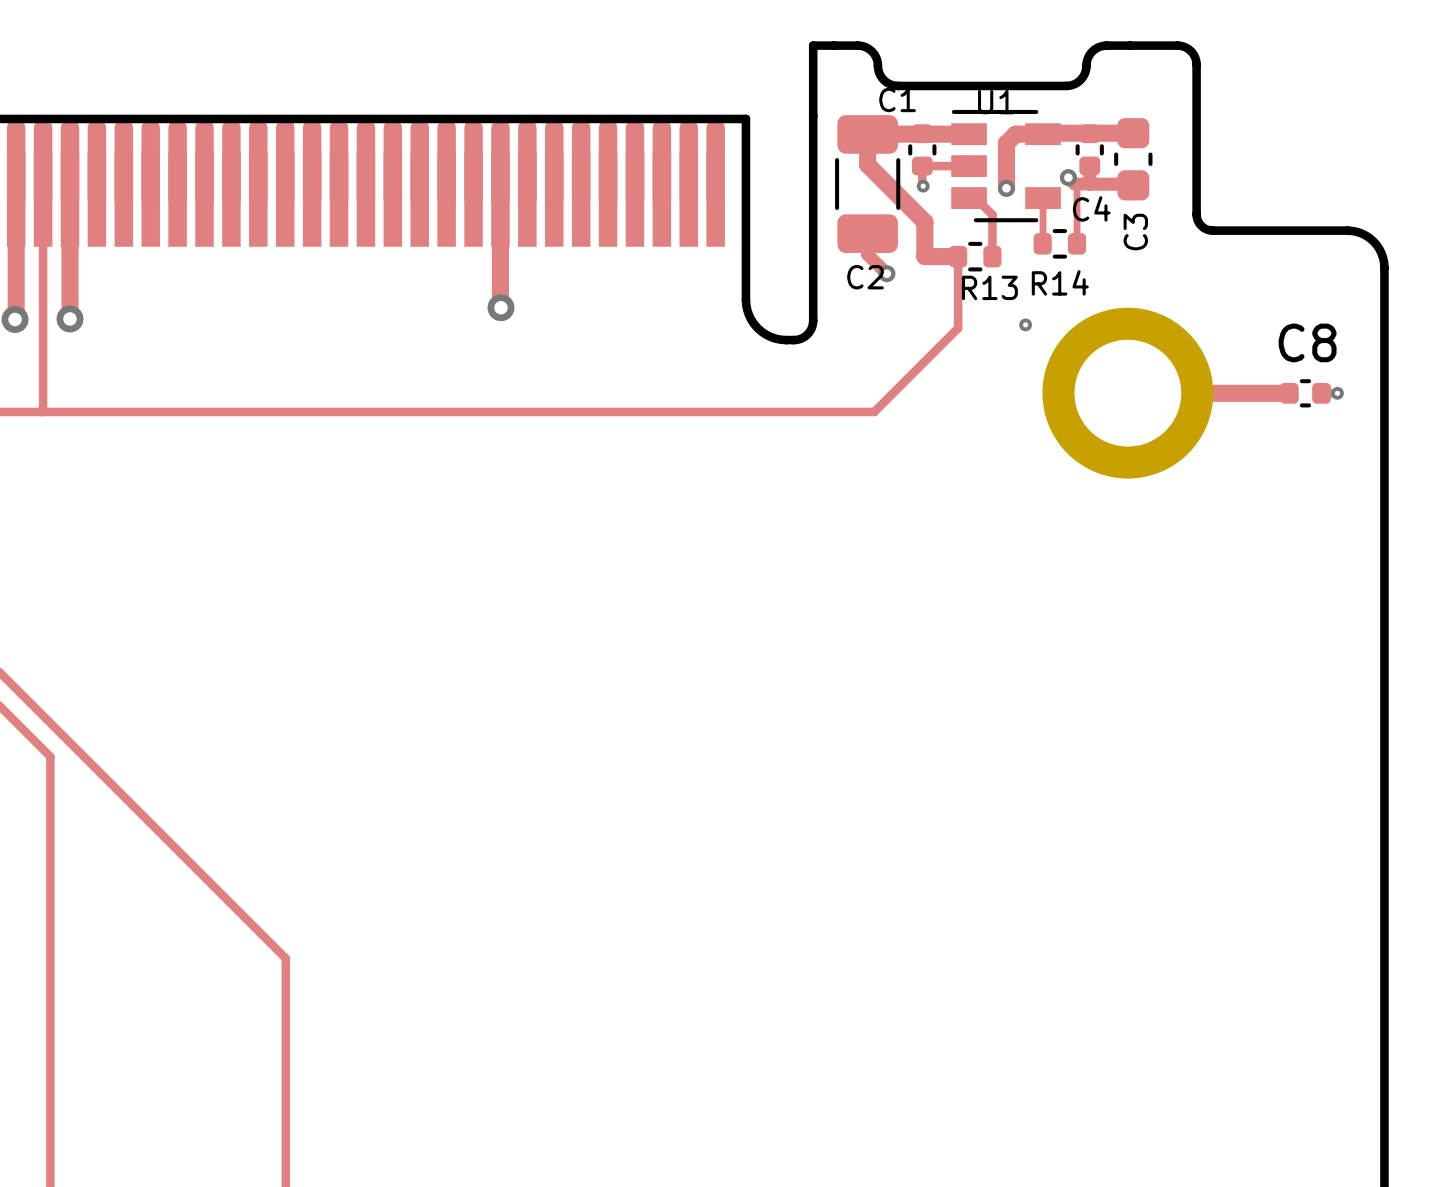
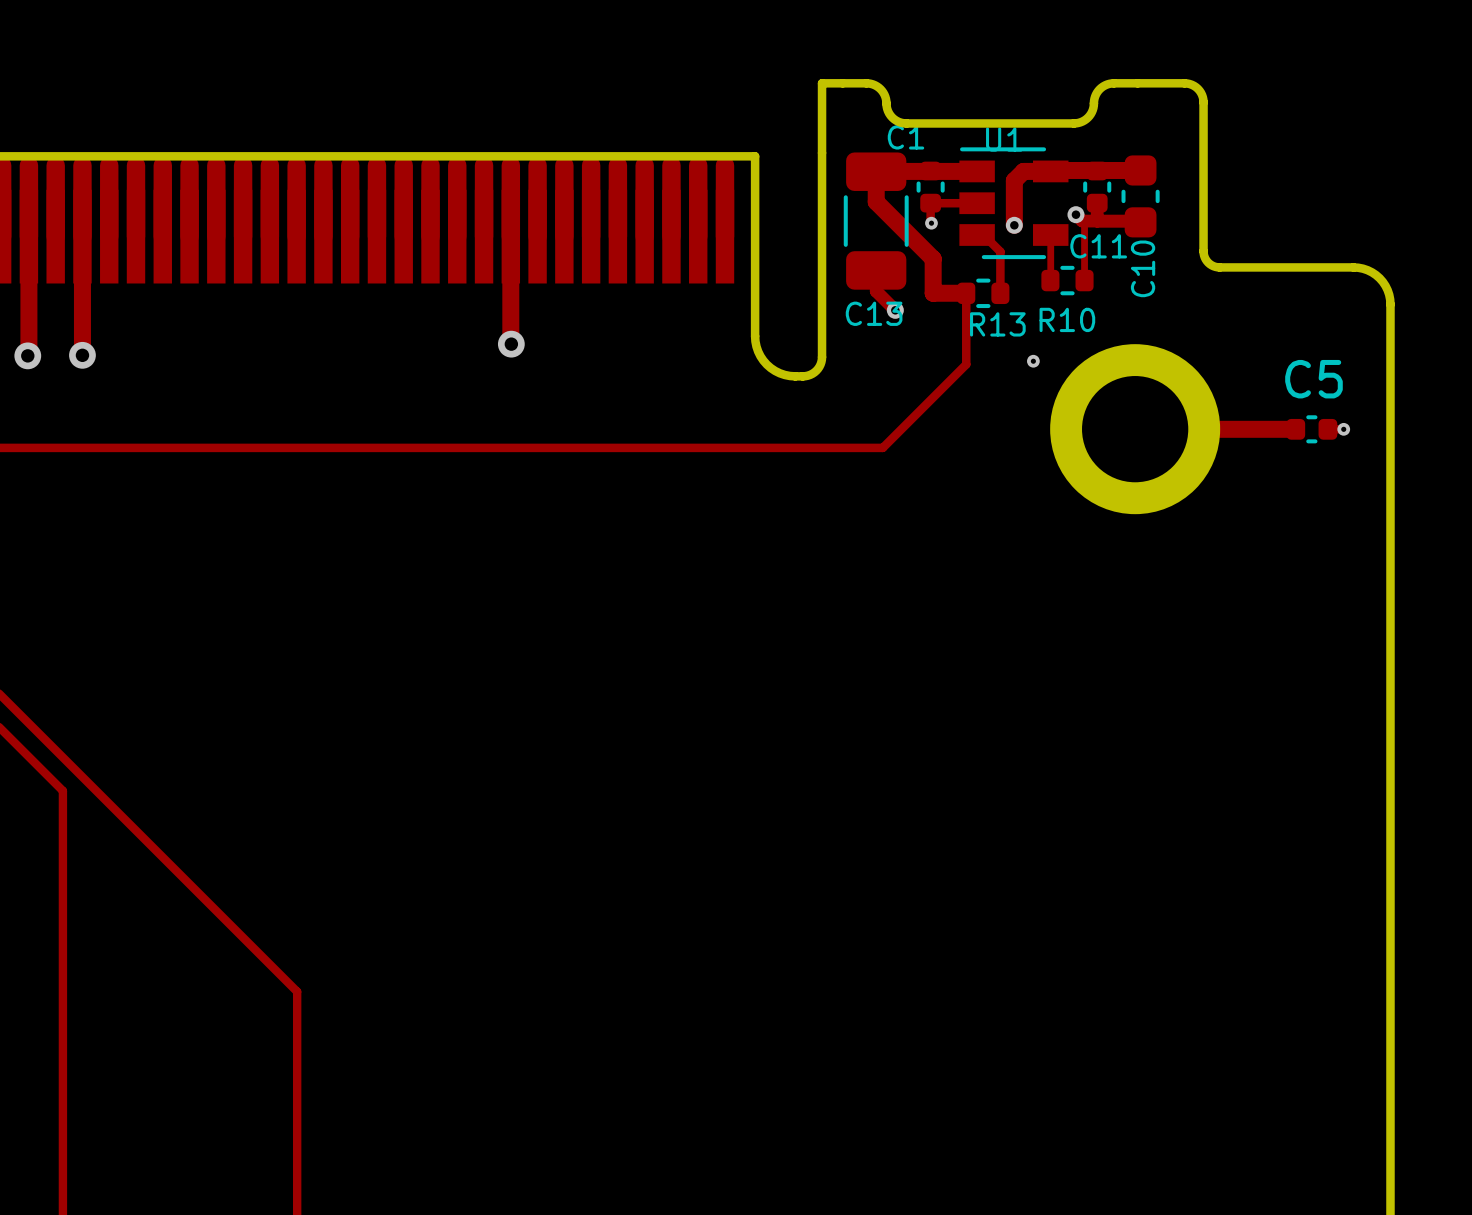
track: (43, 199) (41, 411) -> none
C4 name: C4 (1091, 208) -> C11 (1098, 246)
C3 name: C3 (1135, 232) -> C10 (1143, 268)
C2 name: C2 (865, 277) -> C13 (874, 313)
R14 name: R14 (1060, 282) -> R10 (1067, 319)
C8 name: C8 (1307, 342) -> C5 (1313, 379)

